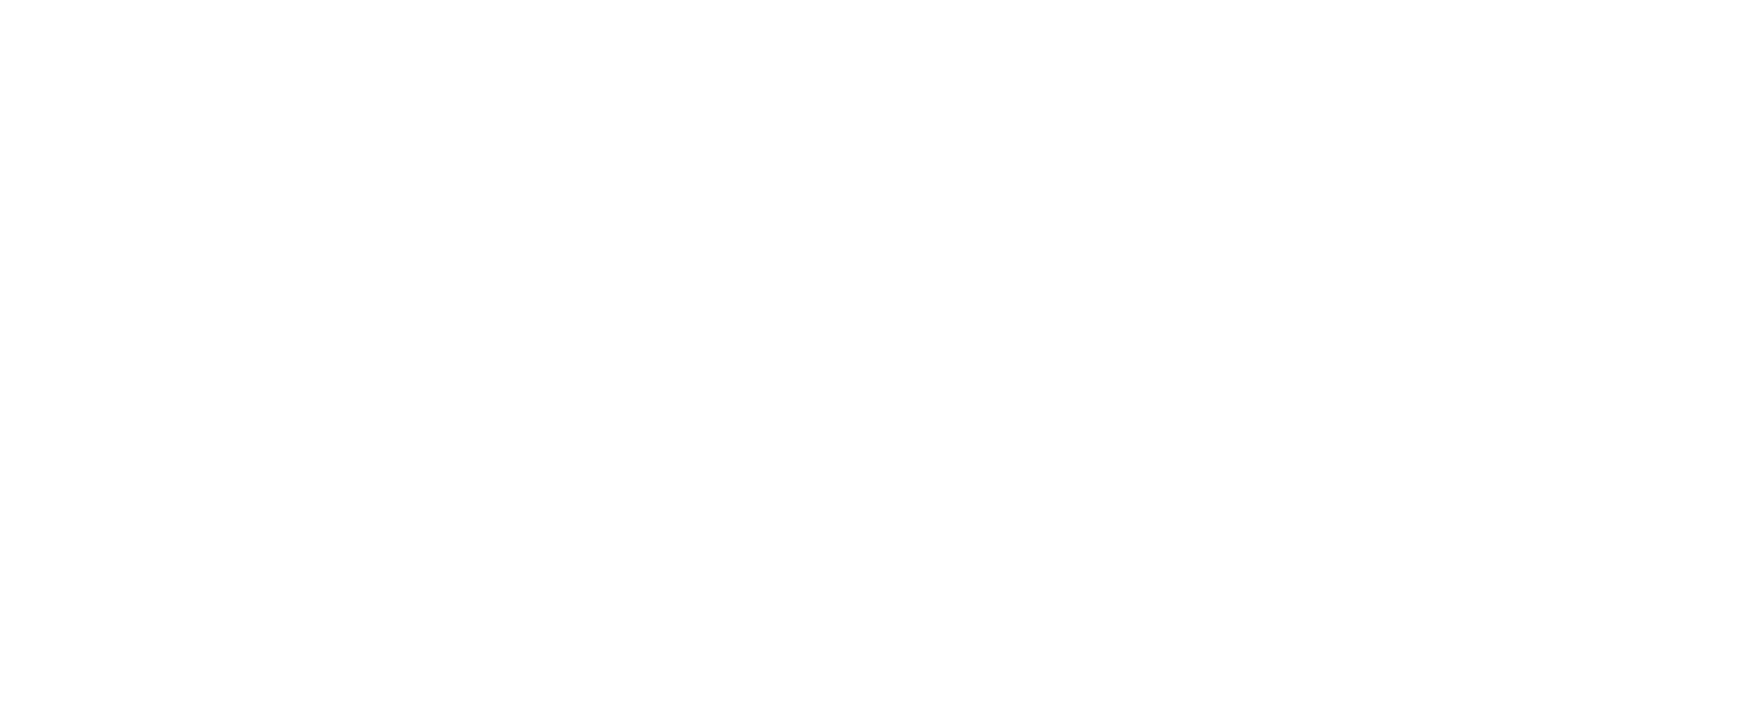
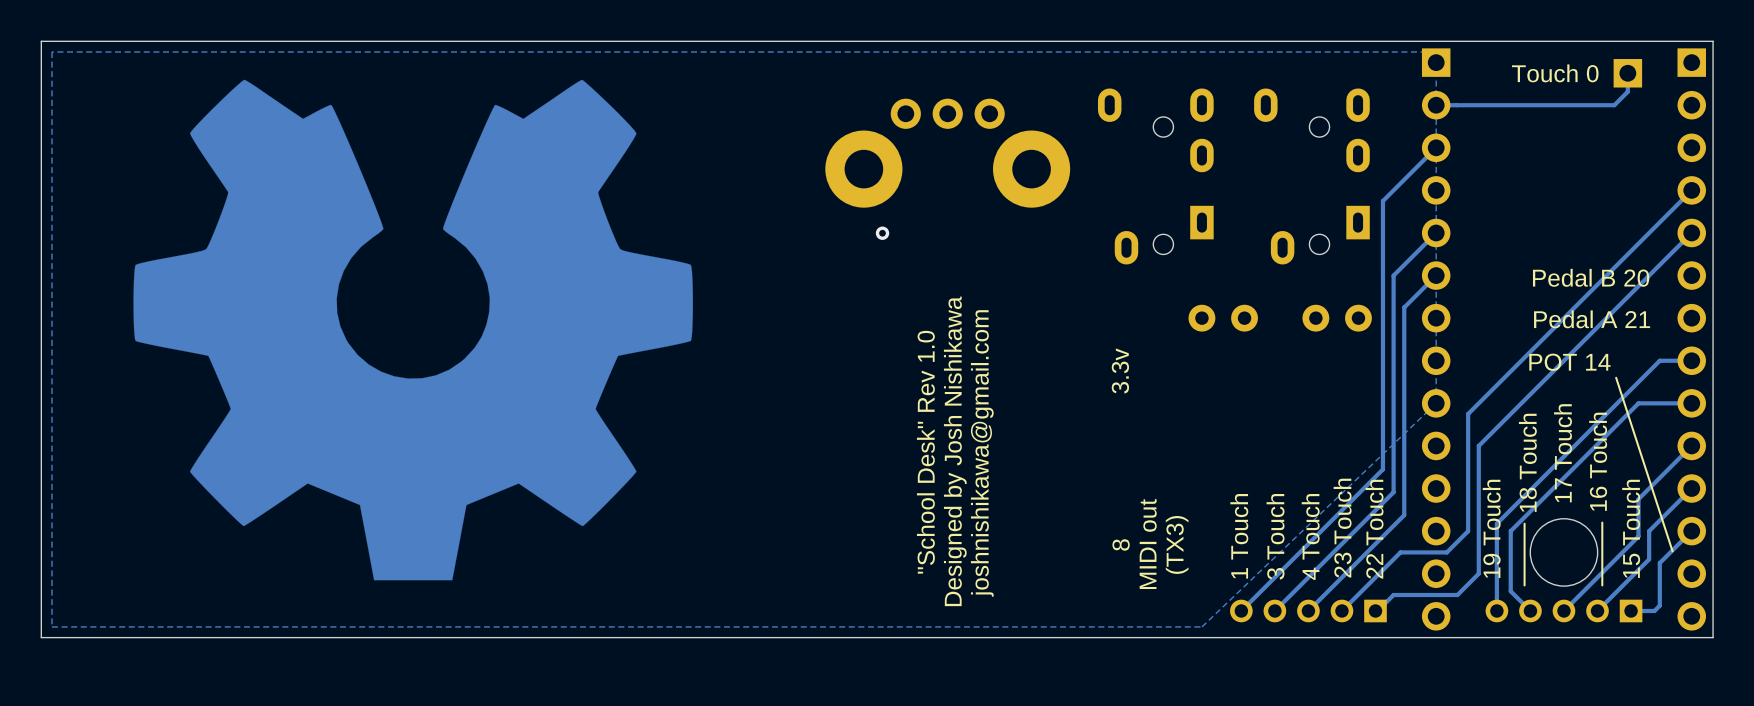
board edge: none -> (1713, 41) (41, 41) (41, 637) (1713, 637) (1713, 41)
zone outline: none -> (1436, 51) (1436, 403) (1201, 626) (51, 626) (51, 51) (1436, 51)
text: none -> Touch 0 (1555, 73)
track: none -> (1627, 73) (1627, 91) (1614, 105) (1436, 105)
part: none -> (1627, 73)
drawing: none -> [133, 79, 693, 581]
track: none -> (1436, 147) (1382, 201) (1382, 469) (1241, 610)
part: none -> (947, 153)
part: none -> (1155, 176)
part: none -> (1311, 176)
track: none -> (1691, 190) (1468, 414) (1468, 531) (1446, 552) (1400, 552) (1341, 610)
track: none -> (1436, 232) (1393, 275) (1393, 492) (1274, 610)
track: none -> (1691, 232) (1478, 445) (1478, 573) (1457, 595) (1393, 595) (1376, 612)
via: none -> (882, 233)
track: none -> (1436, 275) (1404, 307) (1404, 515) (1308, 610)
text: none -> Pedal B 20 (1591, 277)
part: none -> (1223, 318)
part: none -> (1337, 318)
text: none -> Pedal A 21 (1592, 319)
part: none -> (1436, 339)
part: none -> (1691, 339)
track: none -> (1691, 360) (1659, 360) (1496, 523) (1496, 610)
text: none -> POT 14 (1569, 362)
text: none -> 3.3v (1120, 370)
line: none -> (1616, 377) (1672, 551)
track: none -> (1691, 403) (1638, 403) (1510, 531) (1510, 591) (1530, 610)
track: none -> (1691, 445) (1638, 499) (1638, 536) (1563, 610)
text: none -> "School Desk" Rev 1.0 (925, 452)
text: none -> Designed by Josh Nishikawa (955, 451)
text: none -> joshnishikawa@gmail.com (982, 453)
text: none -> 17 Touch (1563, 453)
text: none -> 16 Touch (1598, 461)
text: none -> 18 Touch (1527, 462)
track: none -> (1691, 488) (1649, 531) (1649, 559) (1597, 610)
round board edge: none -> [1529, 518, 1599, 587]
line: none -> (1602, 522) (1602, 585)
line: none -> (1524, 523) (1524, 585)
text: none -> 23 Touch (1342, 528)
text: none -> 22 Touch (1374, 529)
text: none -> 19 Touch (1491, 528)
text: none -> 15 Touch (1631, 528)
track: none -> (1691, 531) (1659, 563) (1659, 605) (1654, 610) (1631, 610)
text: none -> 1 Touch (1239, 536)
text: none -> 4 Touch (1310, 536)
text: none -> 3 Touch (1275, 536)
text: none -> MIDI out (1148, 544)
text: none -> 8 (1121, 544)
text: none -> (TX3) (1177, 544)
part: none -> (1308, 610)
part: none -> (1563, 610)

